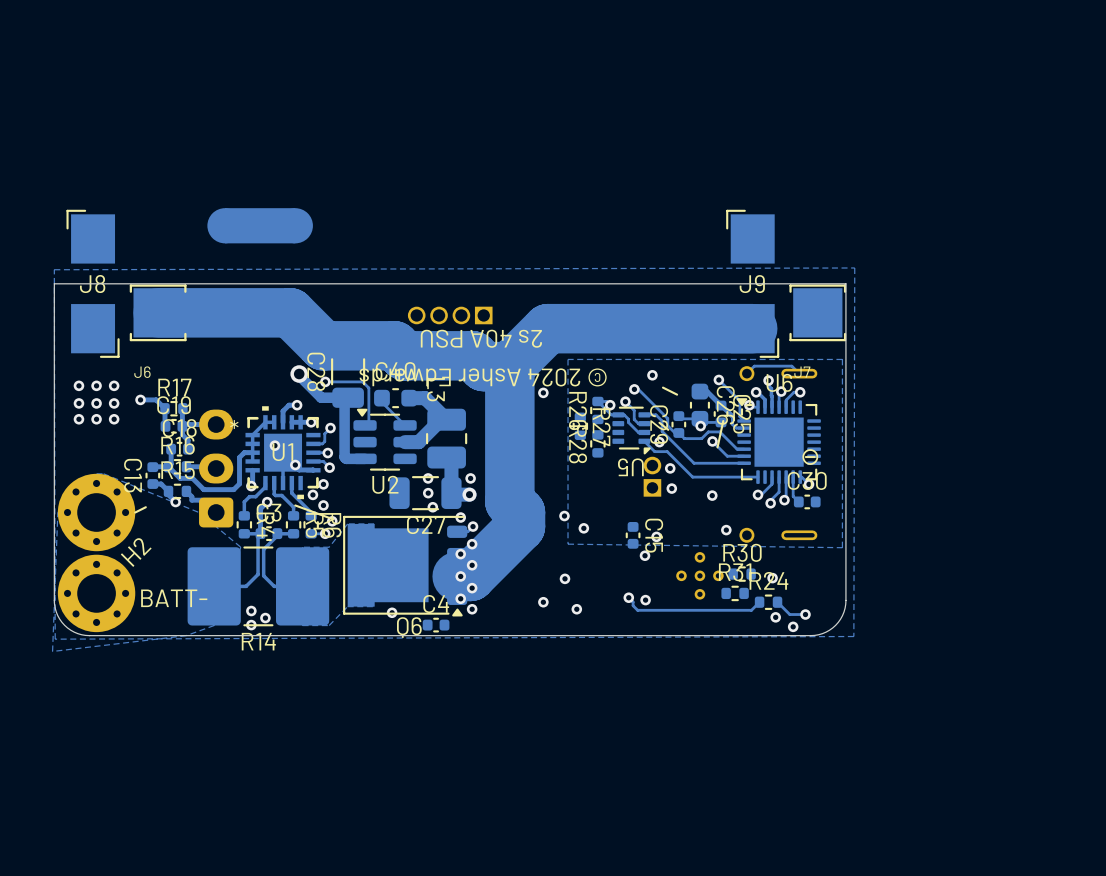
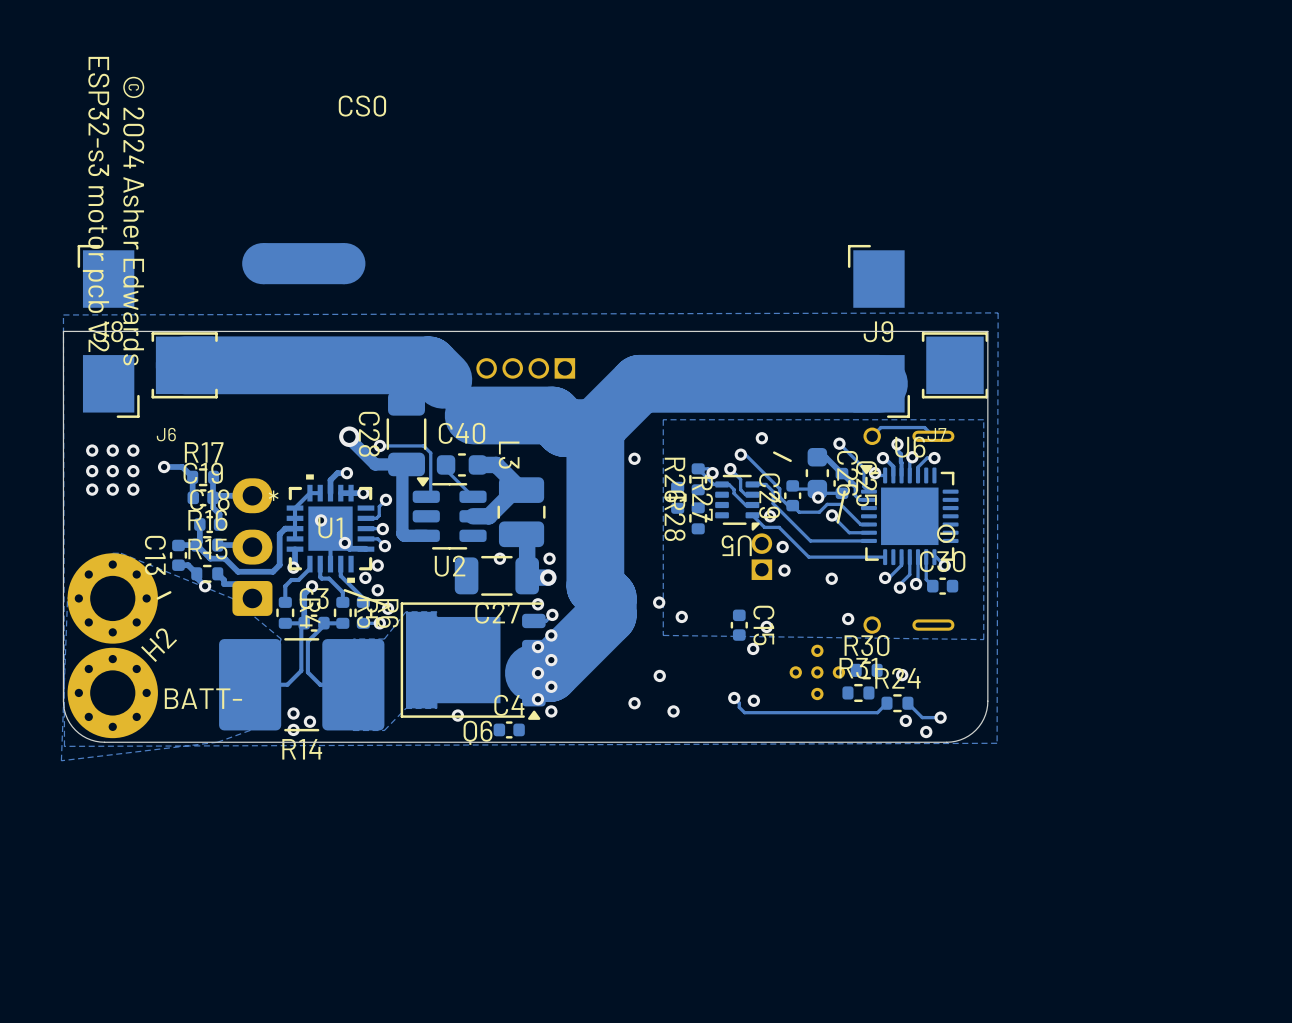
text: none -> CS0 (362, 106)
text: none -> ESP32-s3 motor pcb V2 (96, 204)
text: none -> © 2024 Asher Edwards (133, 221)
track: (290, 312) (323, 345) (394, 345) (405, 355) -> (339, 365) (428, 365) (443, 379)
text: 2s 40A PSU (481, 338) -> none
text: © 2024 Asher Edwards (483, 377) -> none
via: (428, 493) -> none
via: (432, 507) -> none

